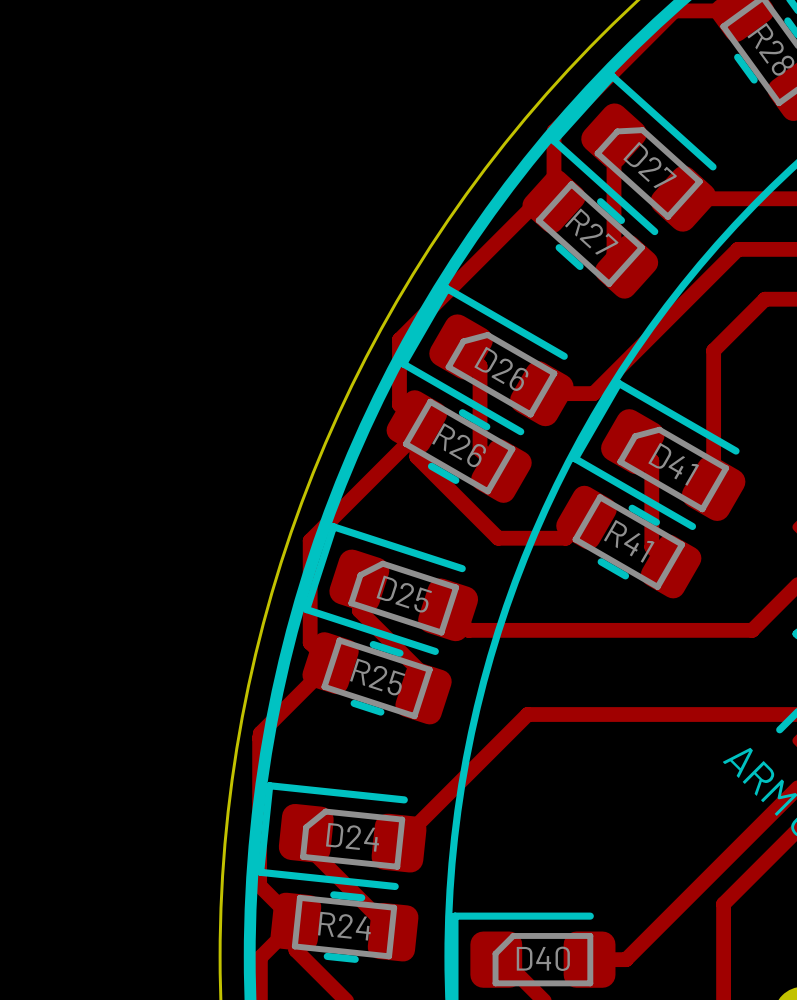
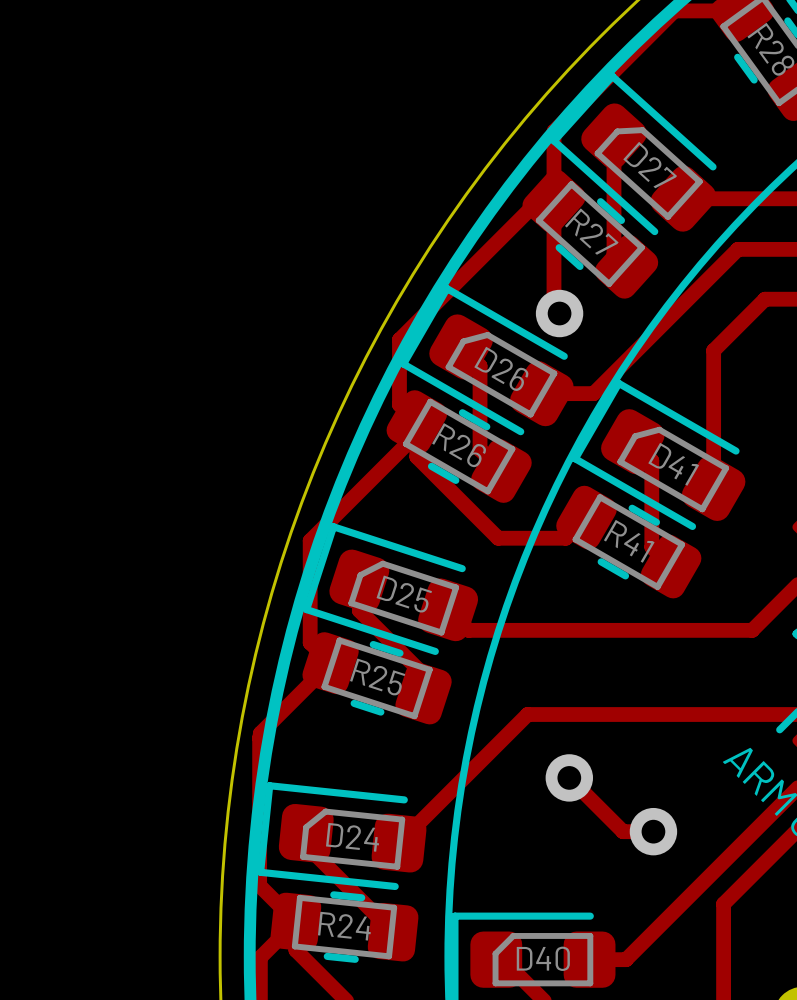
track: none -> (553, 201) (553, 307) (559, 313)
via: none -> (559, 313)
track: none -> (569, 777) (623, 831) (653, 831)
via: none -> (569, 777)
via: none -> (653, 831)

